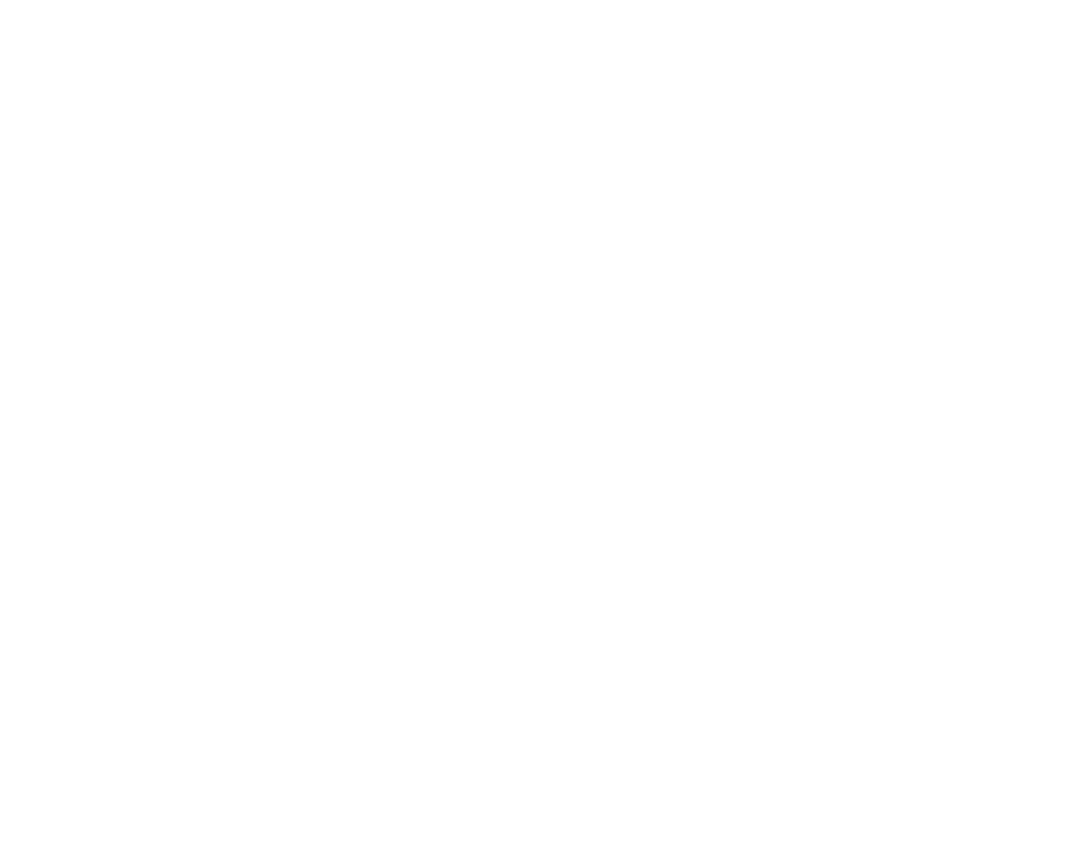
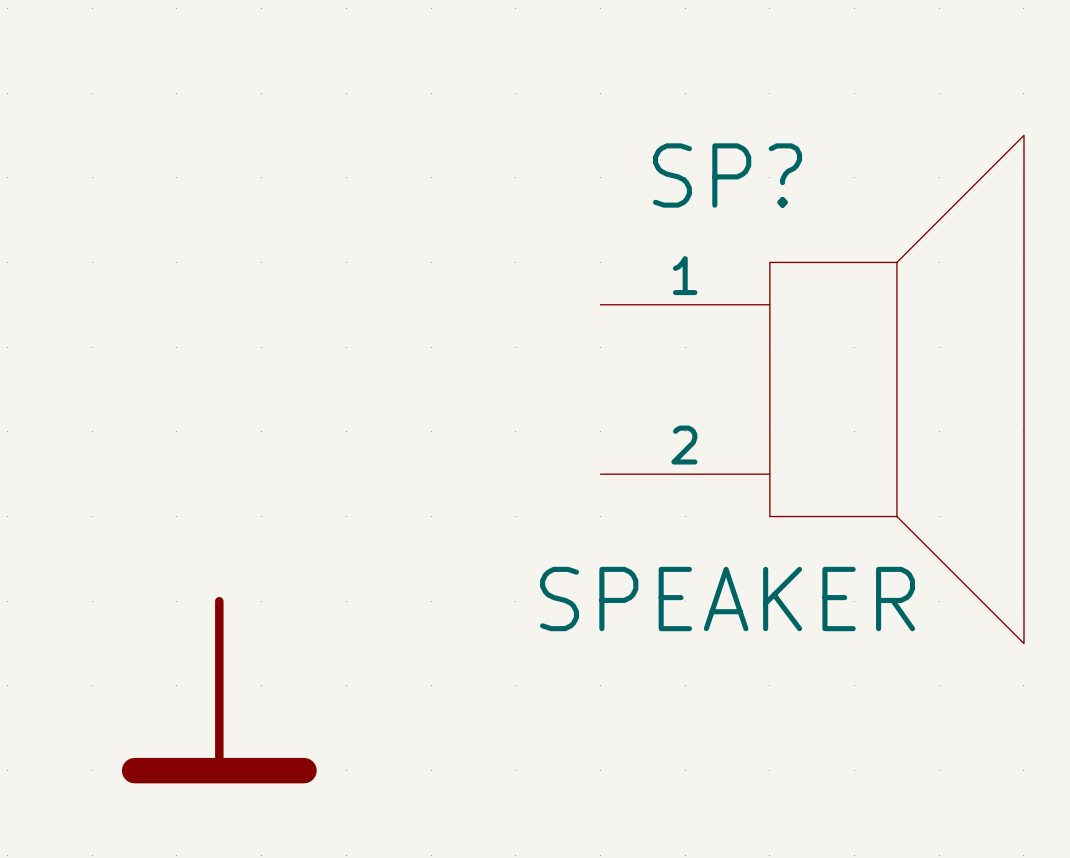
SP?: none -> SPEAKER (812, 389)
power symbol: none -> (219, 690)

